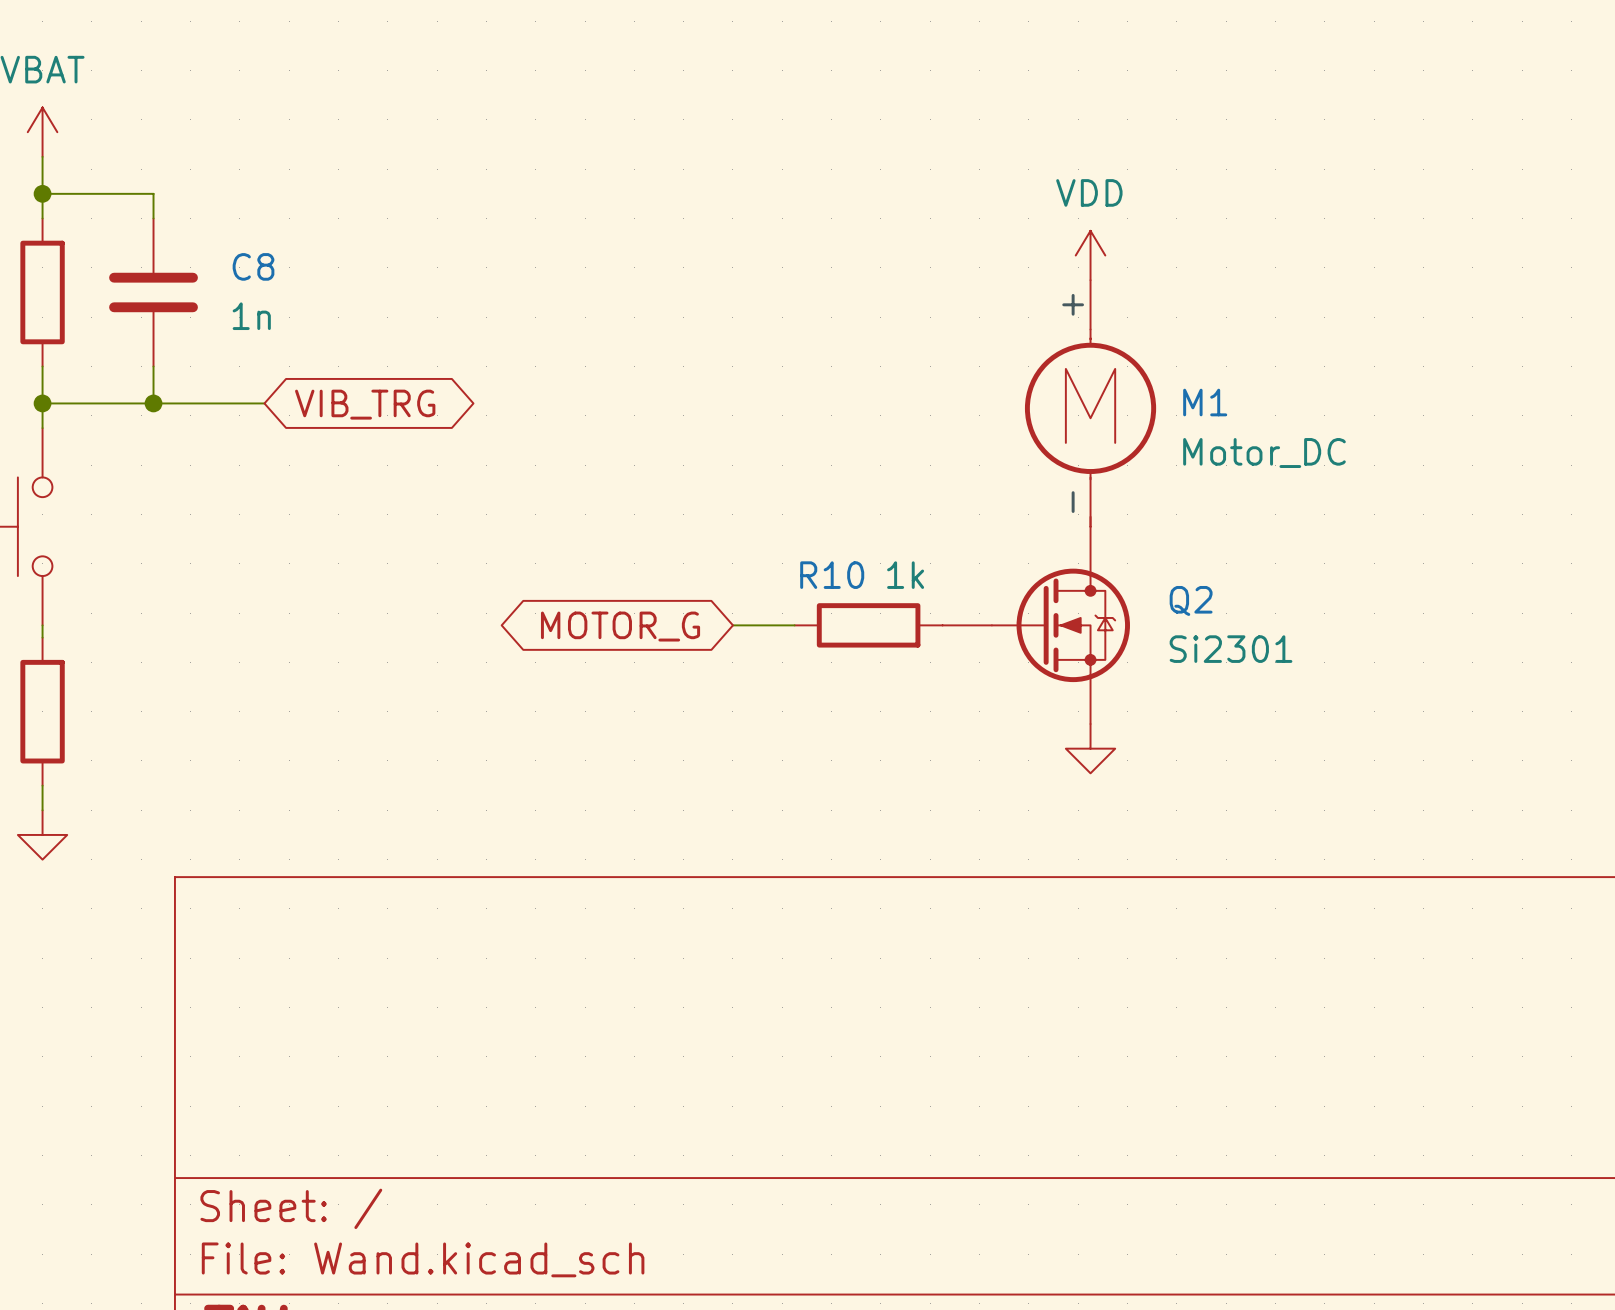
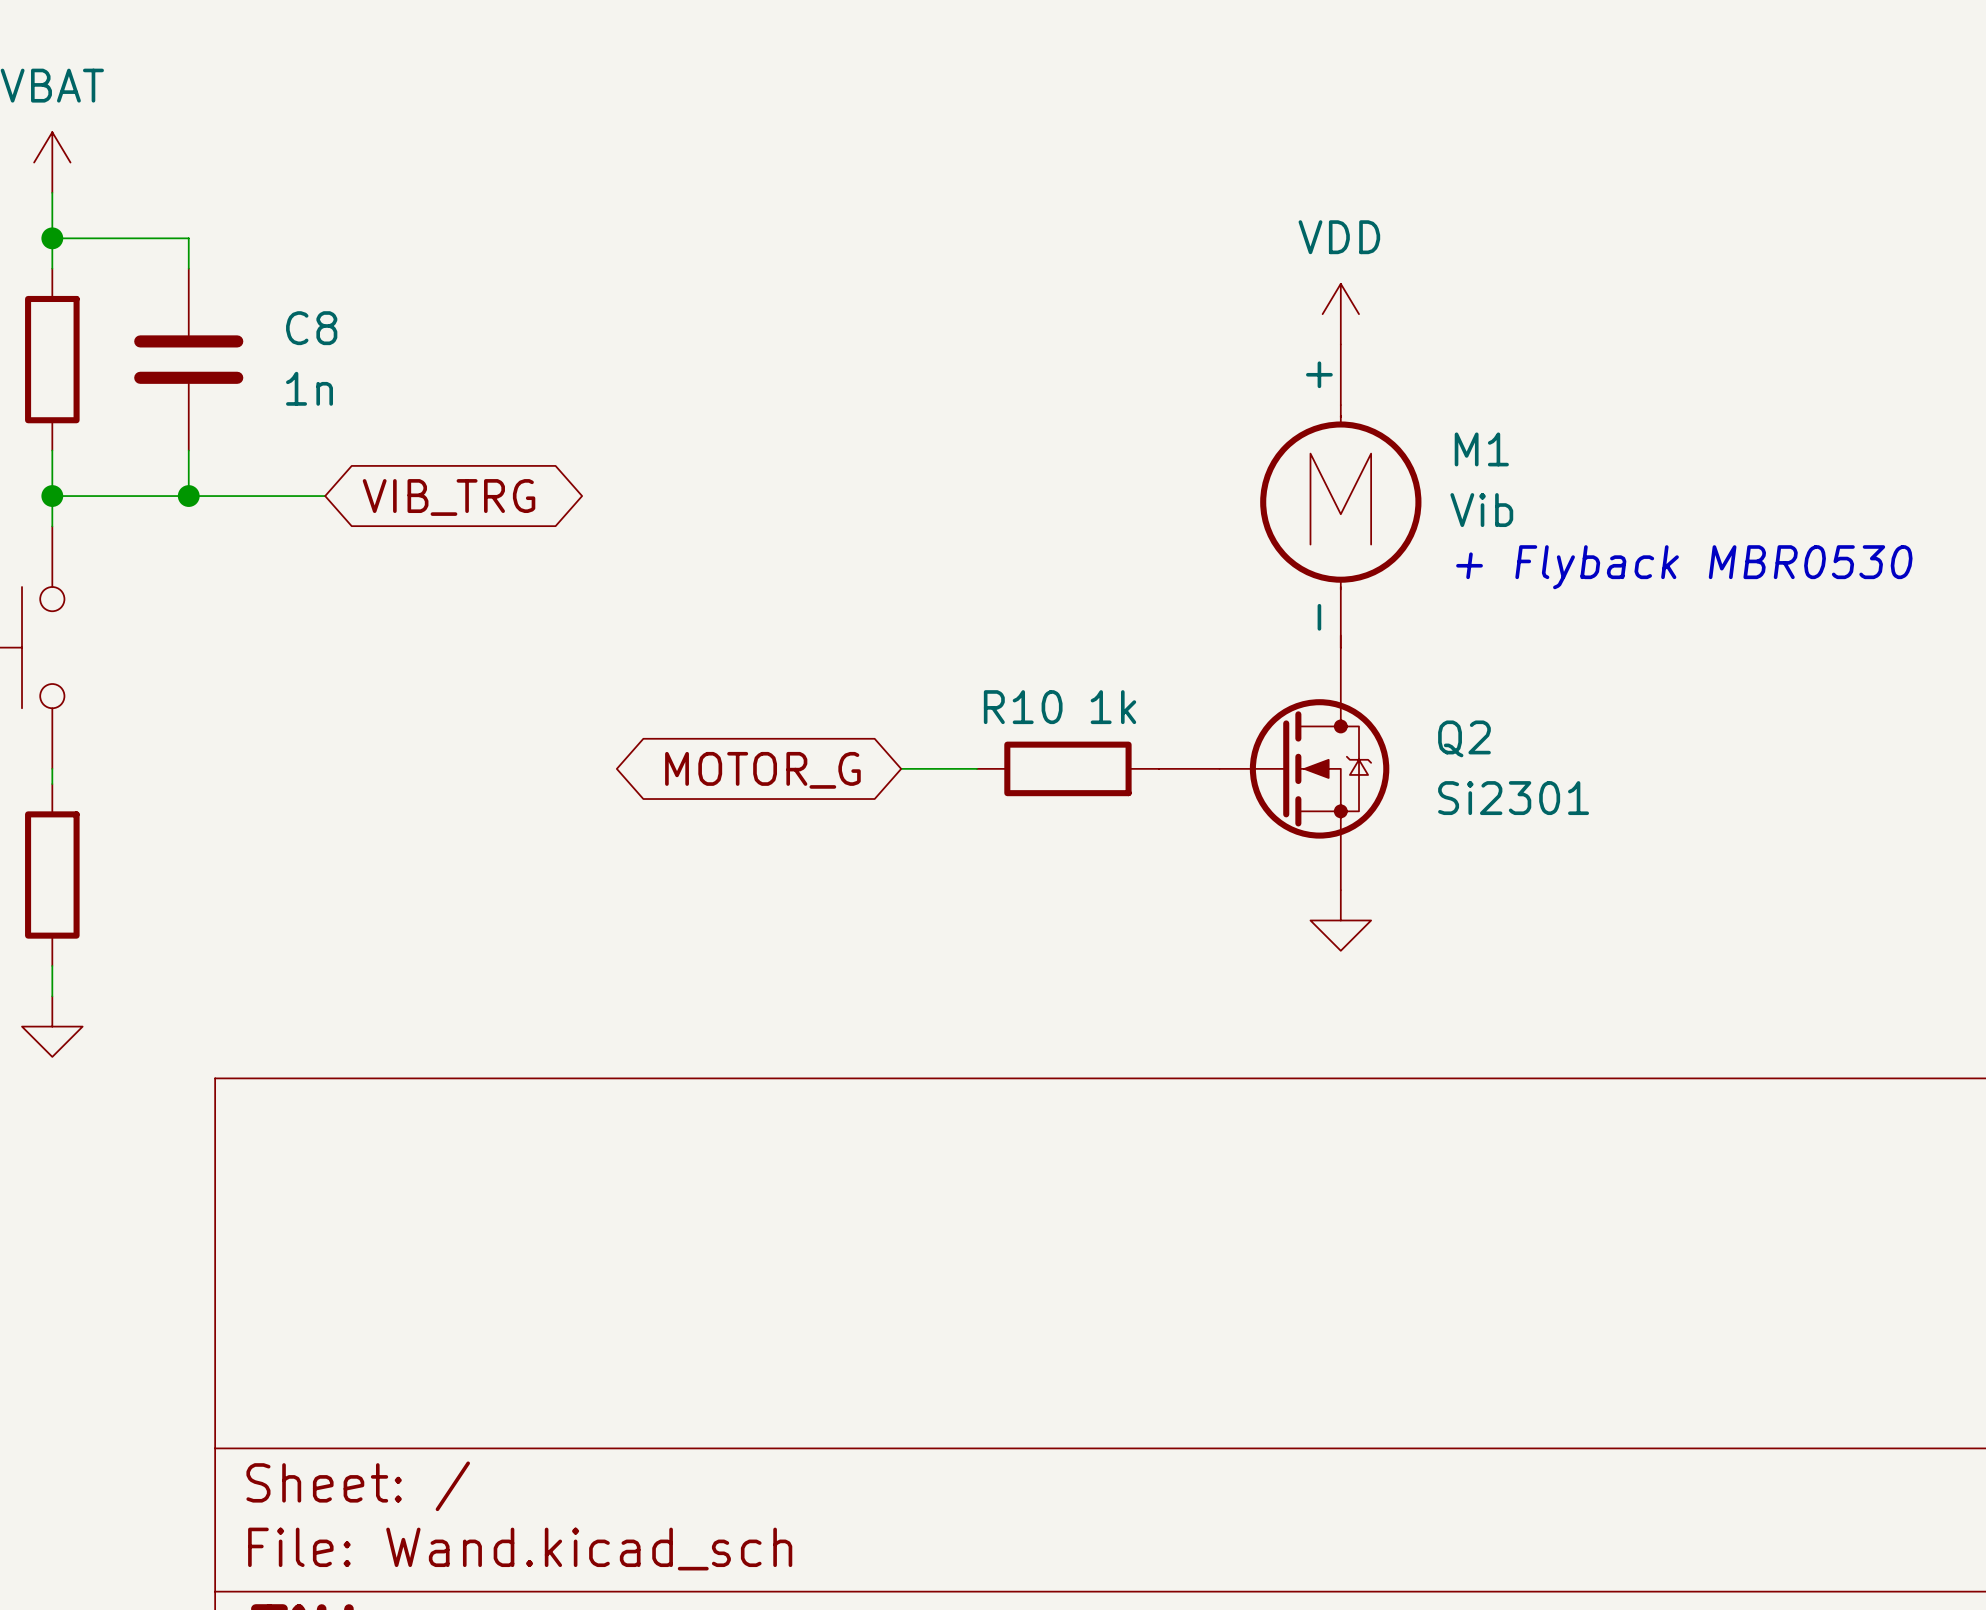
M1 name position: M1 (1205, 402) -> M1 (1481, 449)
M1 value: Motor_DC (1264, 453) -> Vib (1481, 510)
text: none -> + Flyback MBR0530 (1684, 567)

